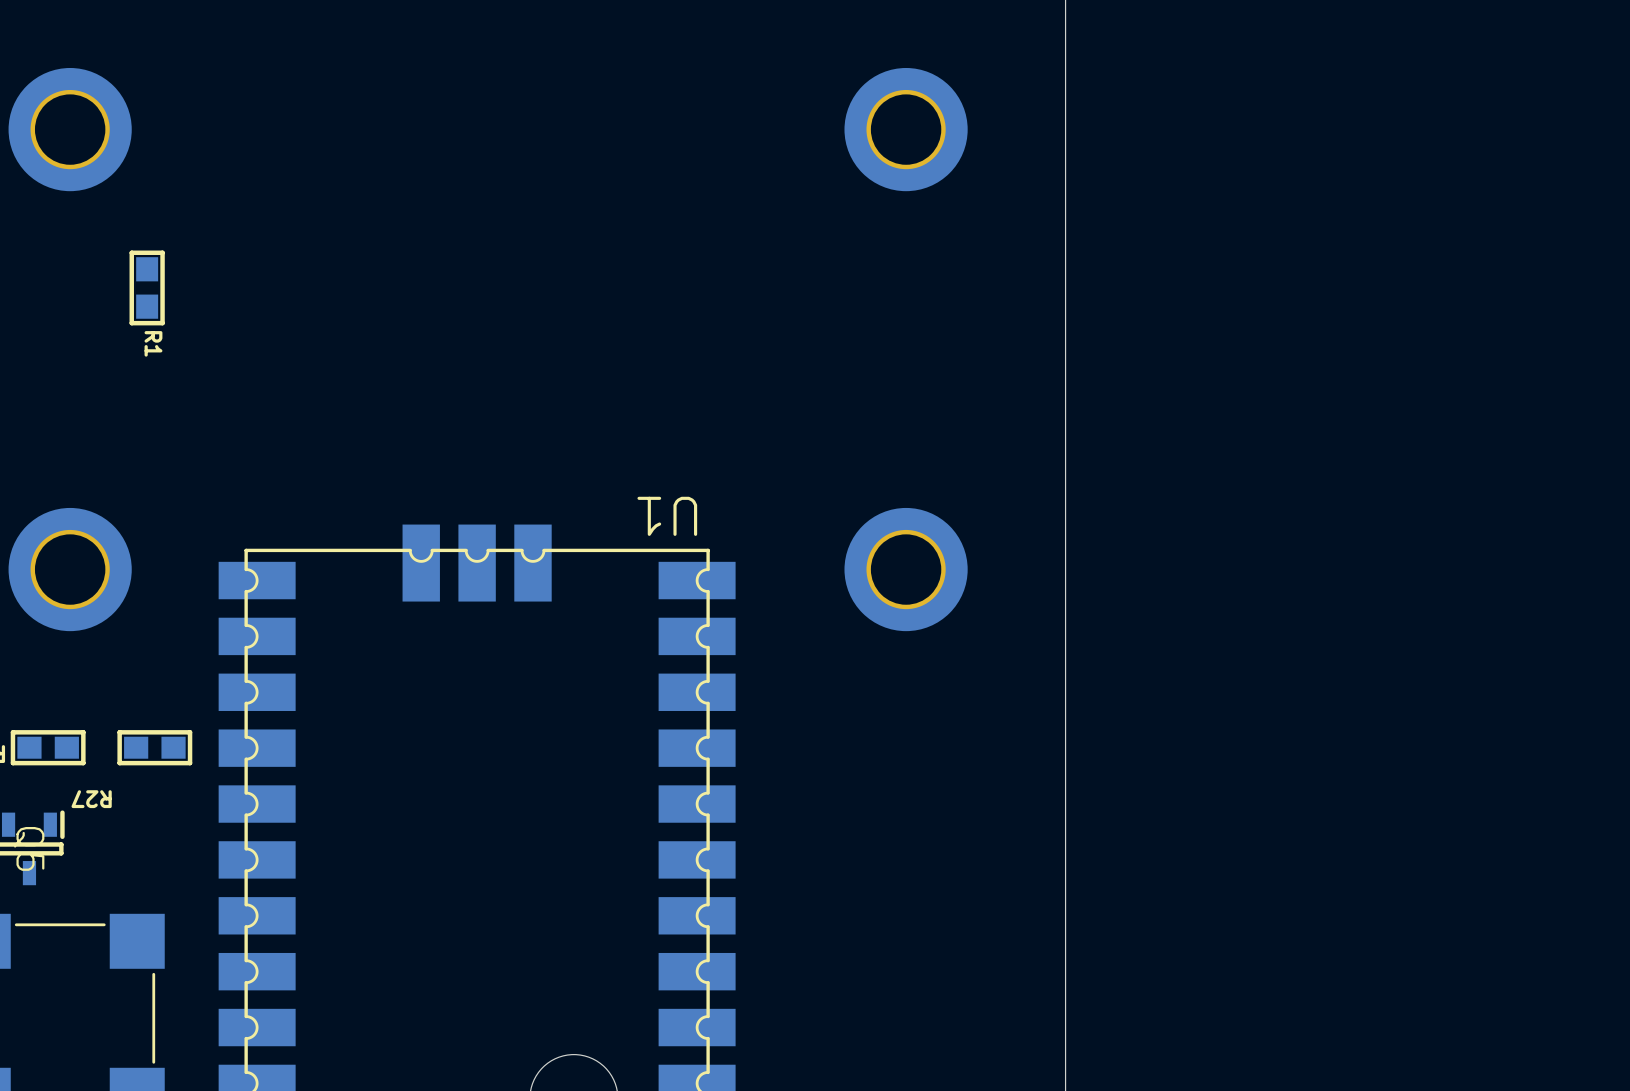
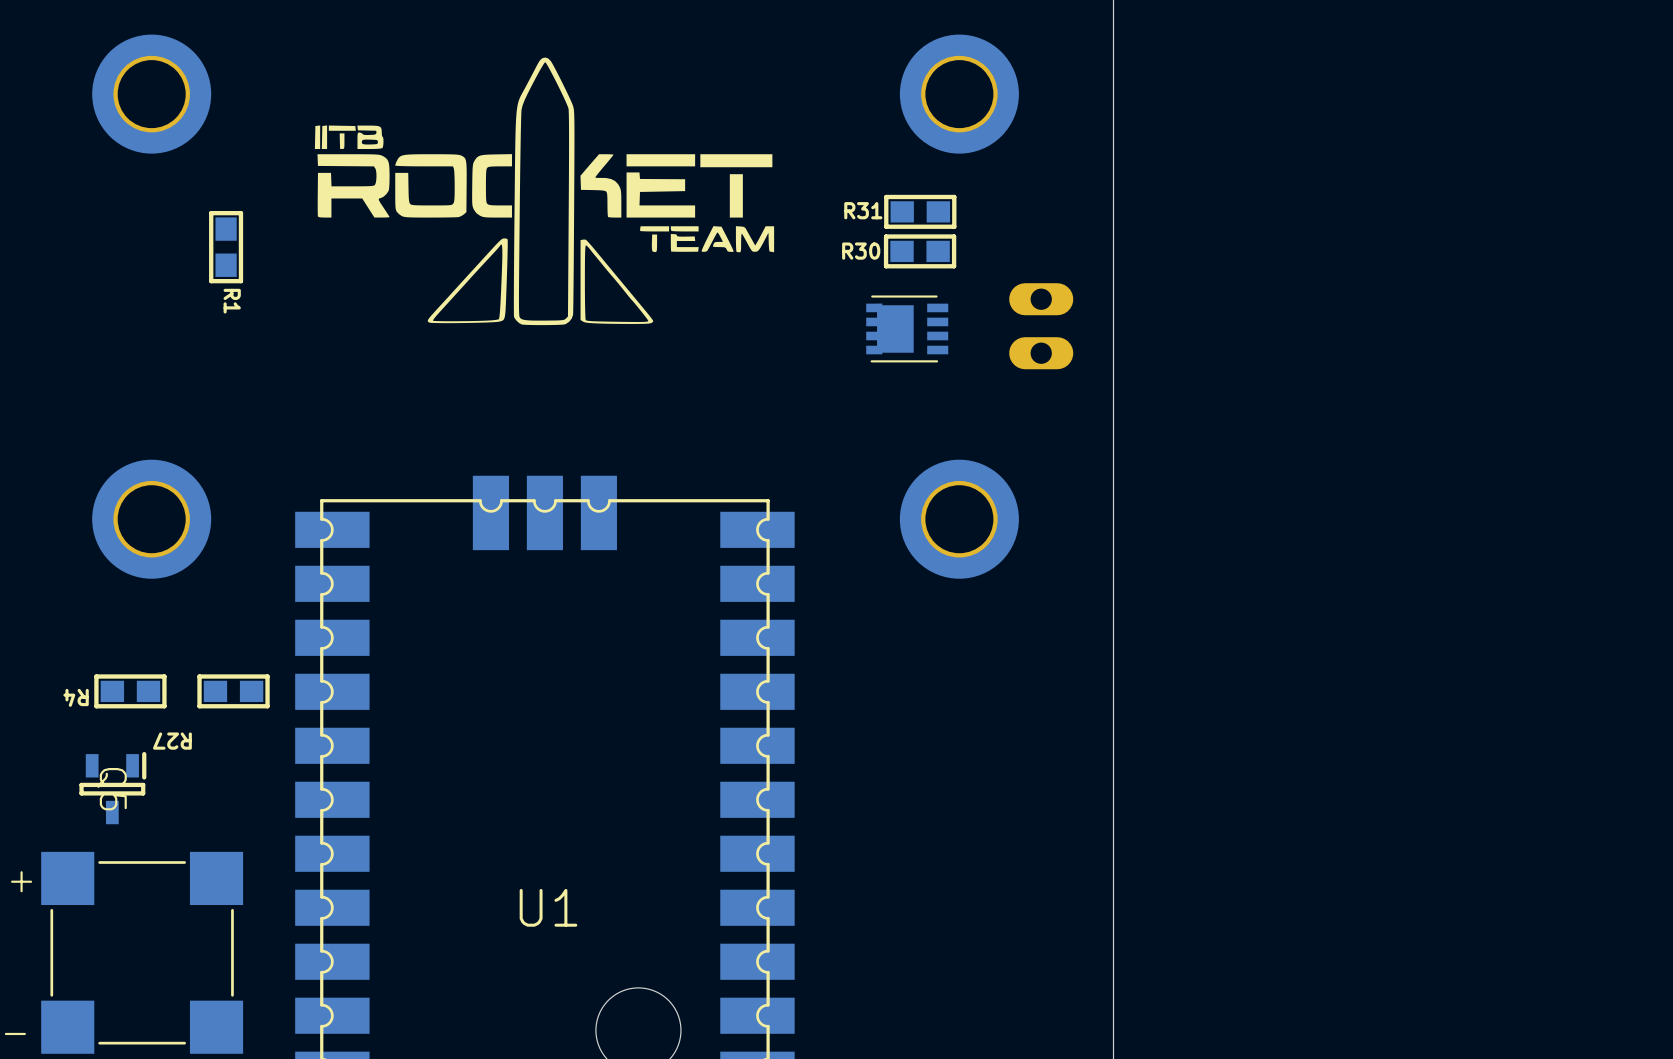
drawing: none -> [314, 57, 775, 326]
R31: none -> (920, 211)
R30: none -> (920, 251)
part: none -> (1041, 326)
part: none -> (907, 328)
U1 name rotation: 0° (667, 516) -> 180° (548, 907)
U1 name position: U1 (667, 516) -> U1 (548, 907)

